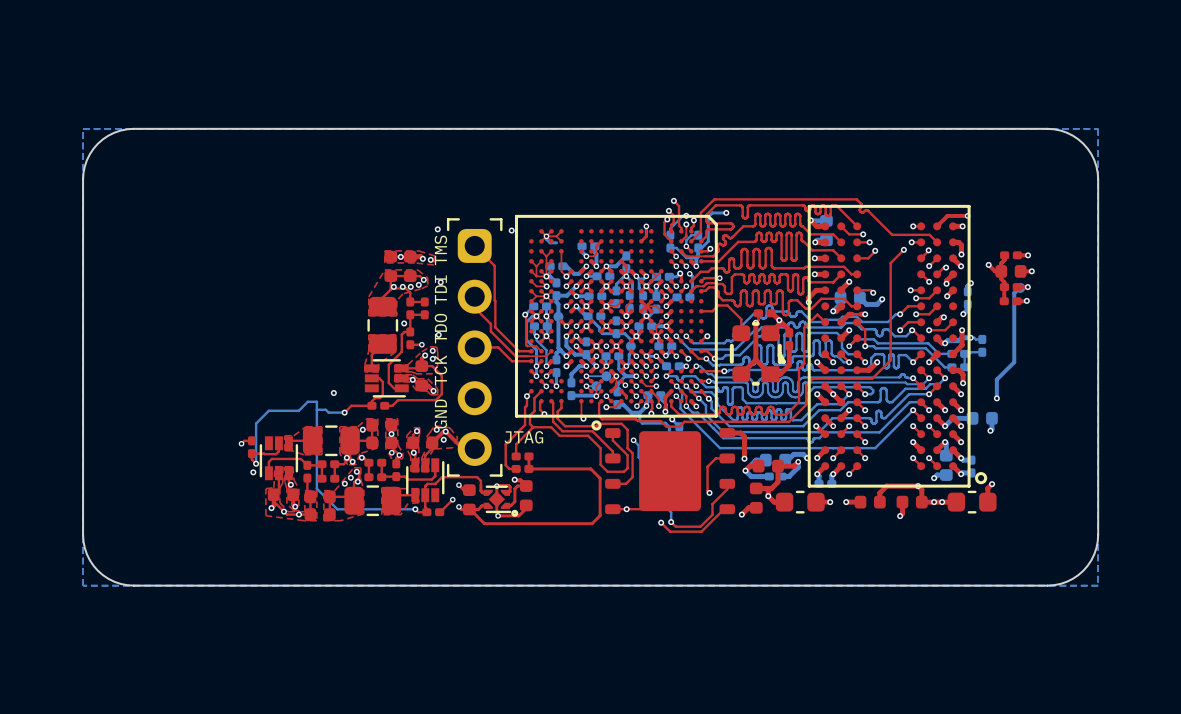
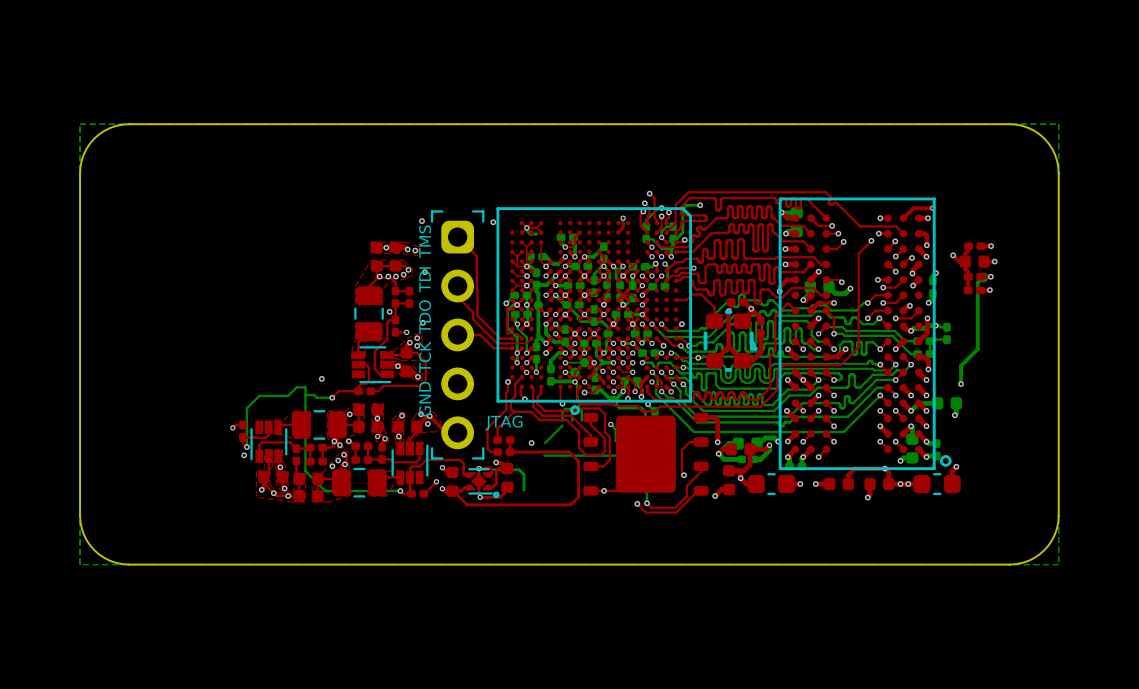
bottom track: none -> (574, 381) (577, 384) (579, 406) (576, 409) (565, 409) (562, 411) (562, 420)
bottom track: none -> (578, 407) (581, 410) (581, 420)
bottom track: none -> (572, 409) (572, 420)
bottom track: none -> (562, 425) (545, 443)
via: none -> (531, 443)
bottom track: none -> (544, 455) (631, 455)
bottom track: none -> (494, 469) (519, 469) (524, 474) (524, 489)

